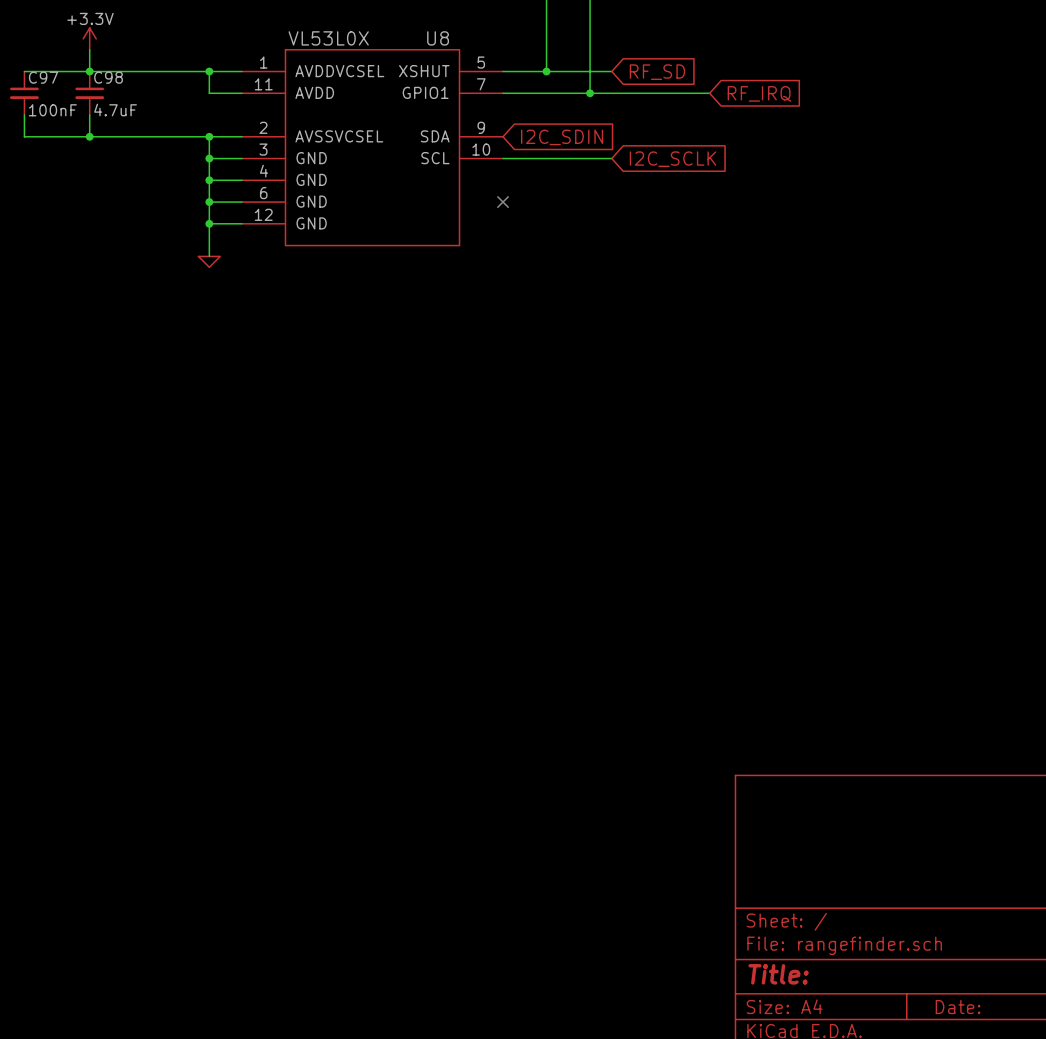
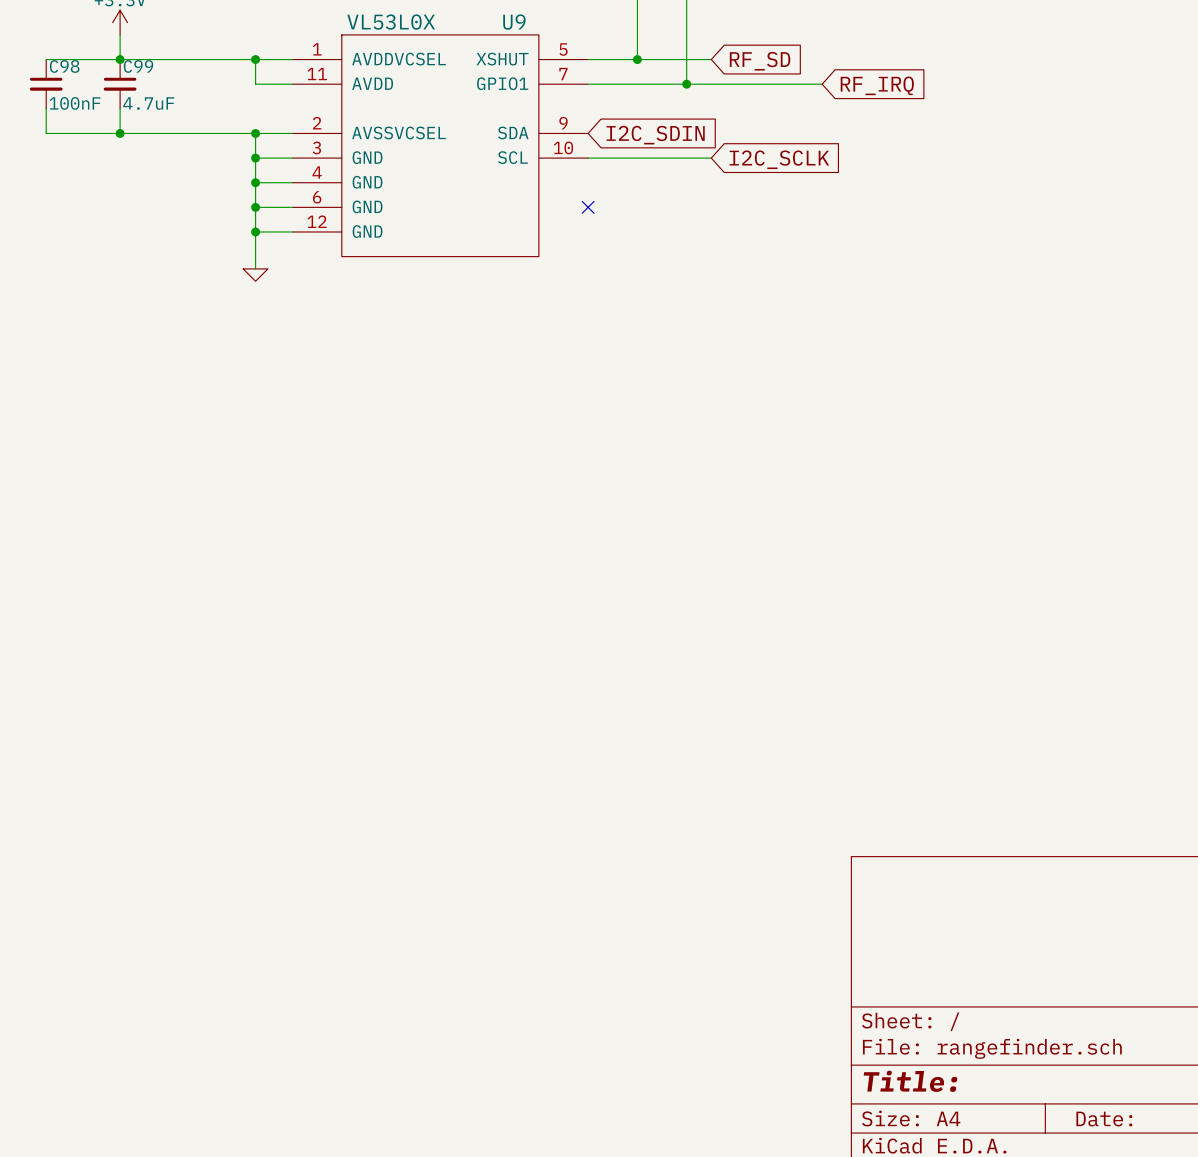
U8 name: U8 (438, 38) -> U9 (514, 22)
C97 name: C97 (43, 77) -> C98 (64, 66)
C98 name: C98 (108, 77) -> C99 (138, 66)

